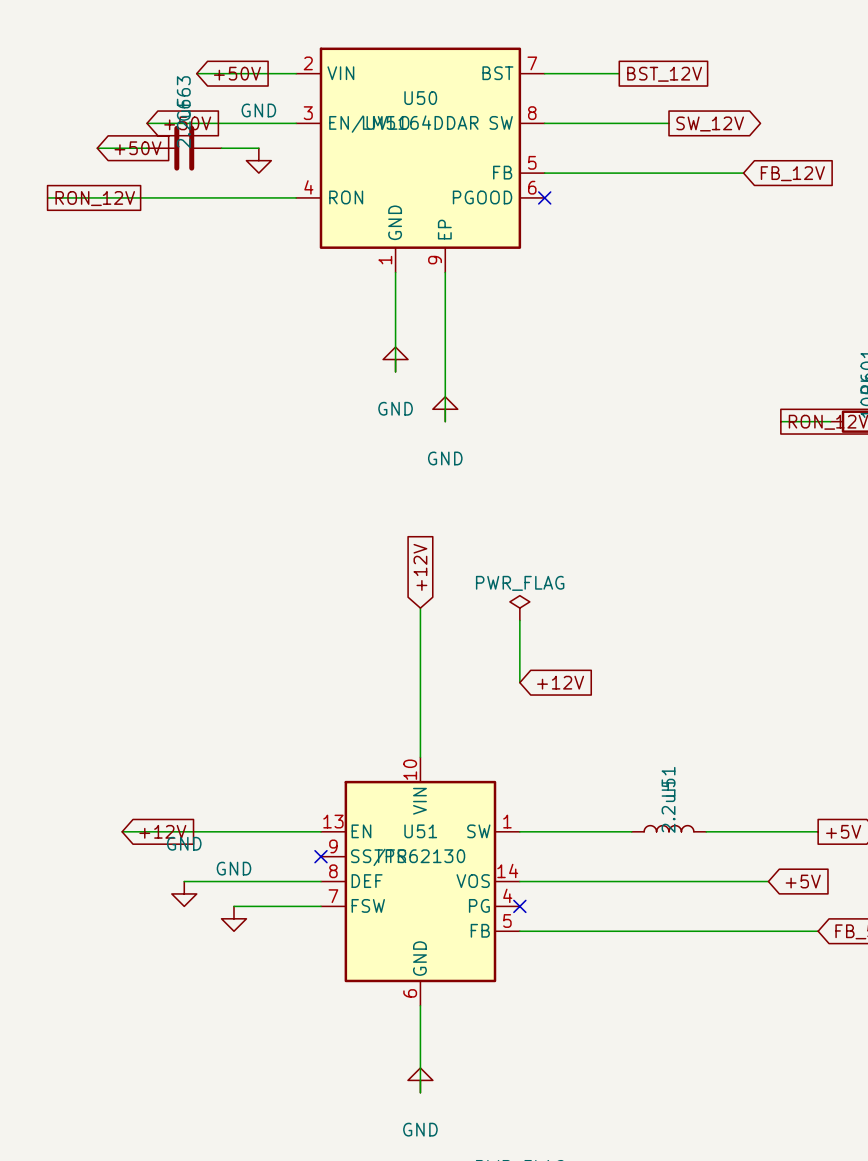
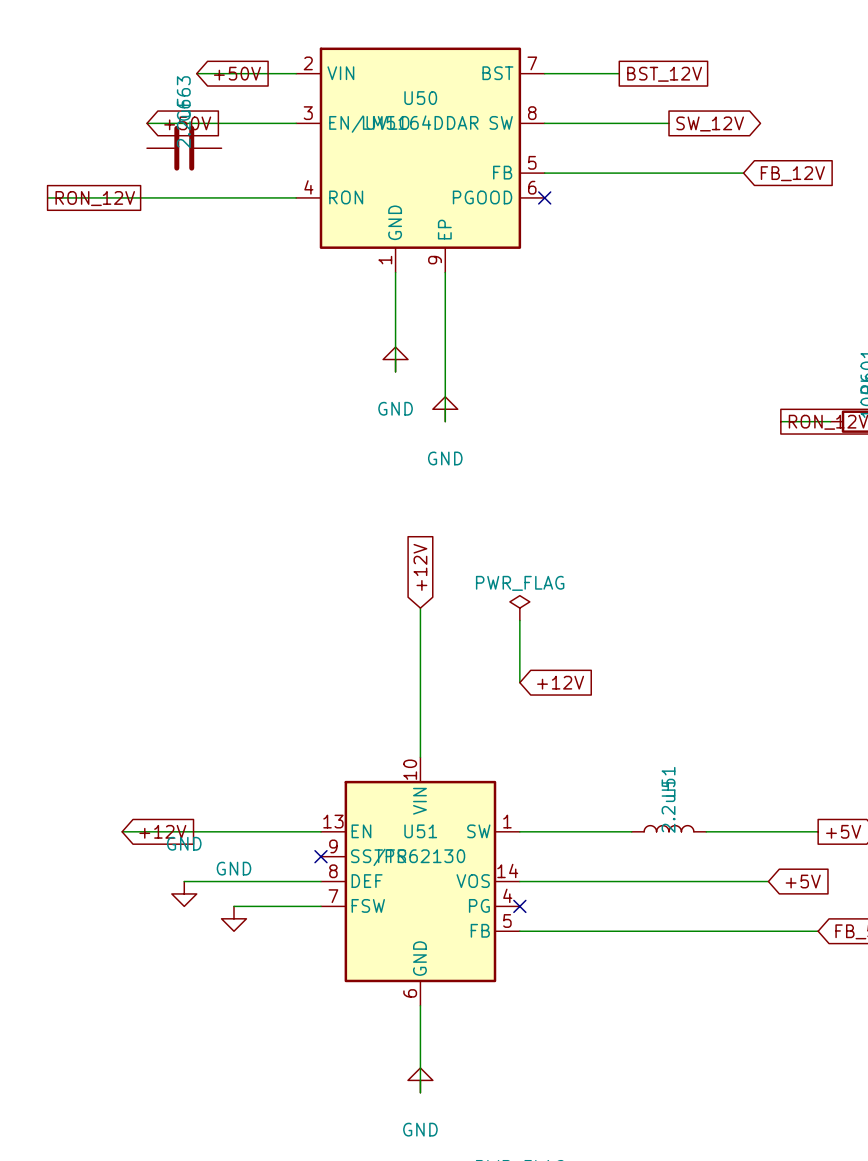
wire: (97, 148) (146, 148) -> none
global label: +50V (137, 148) -> none
wire: (221, 148) (258, 148) -> none
power symbol: GND (258, 160) -> none

